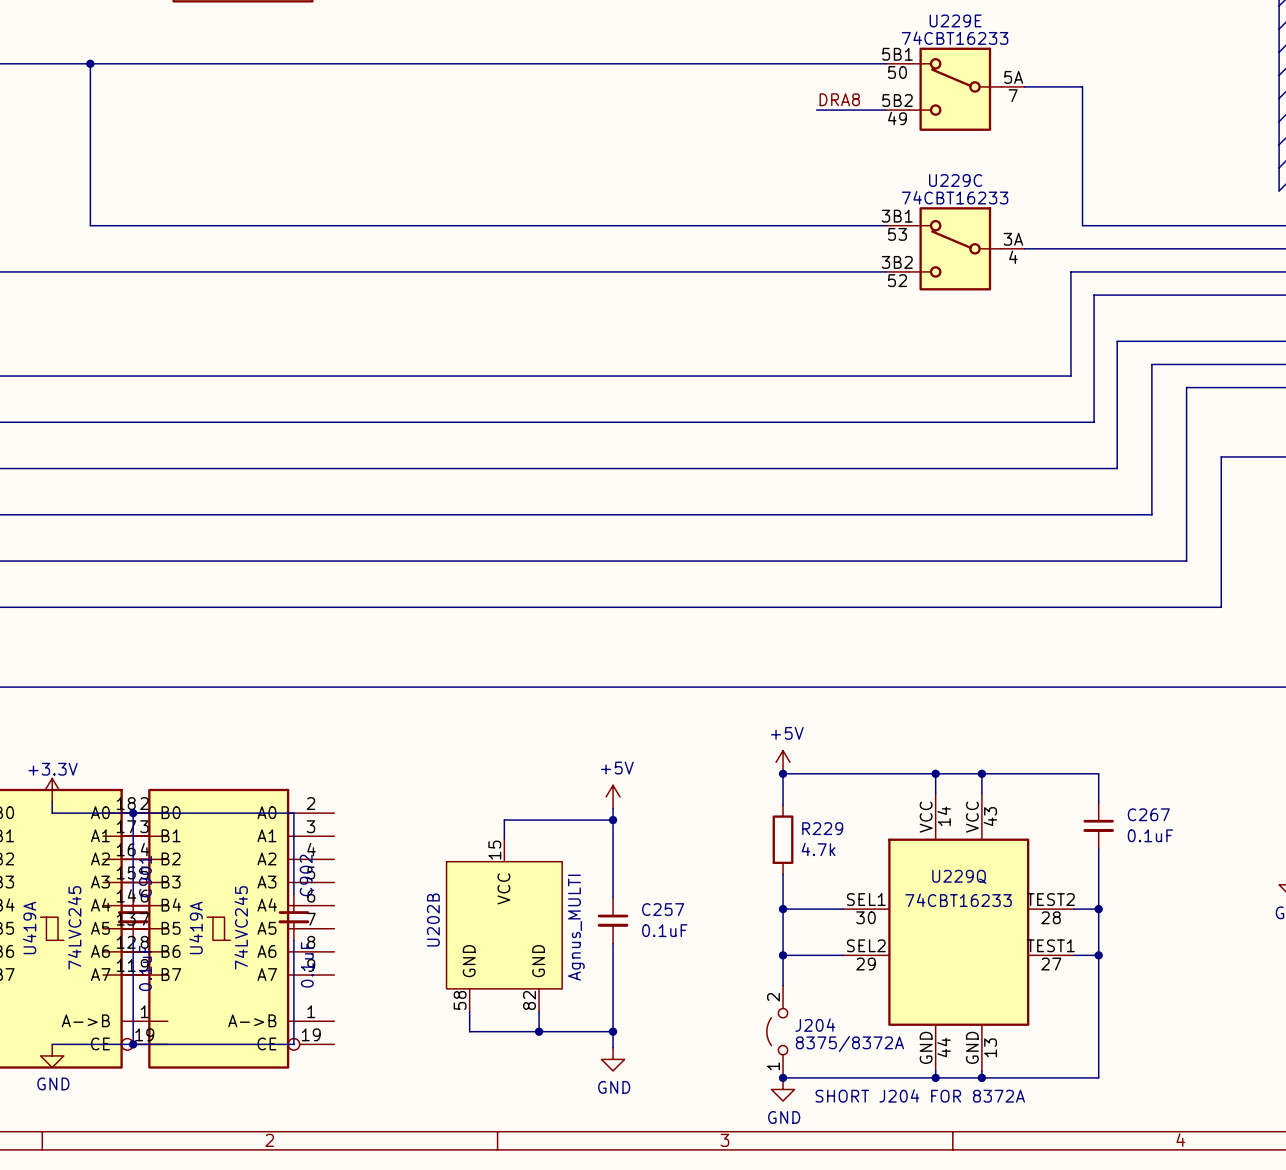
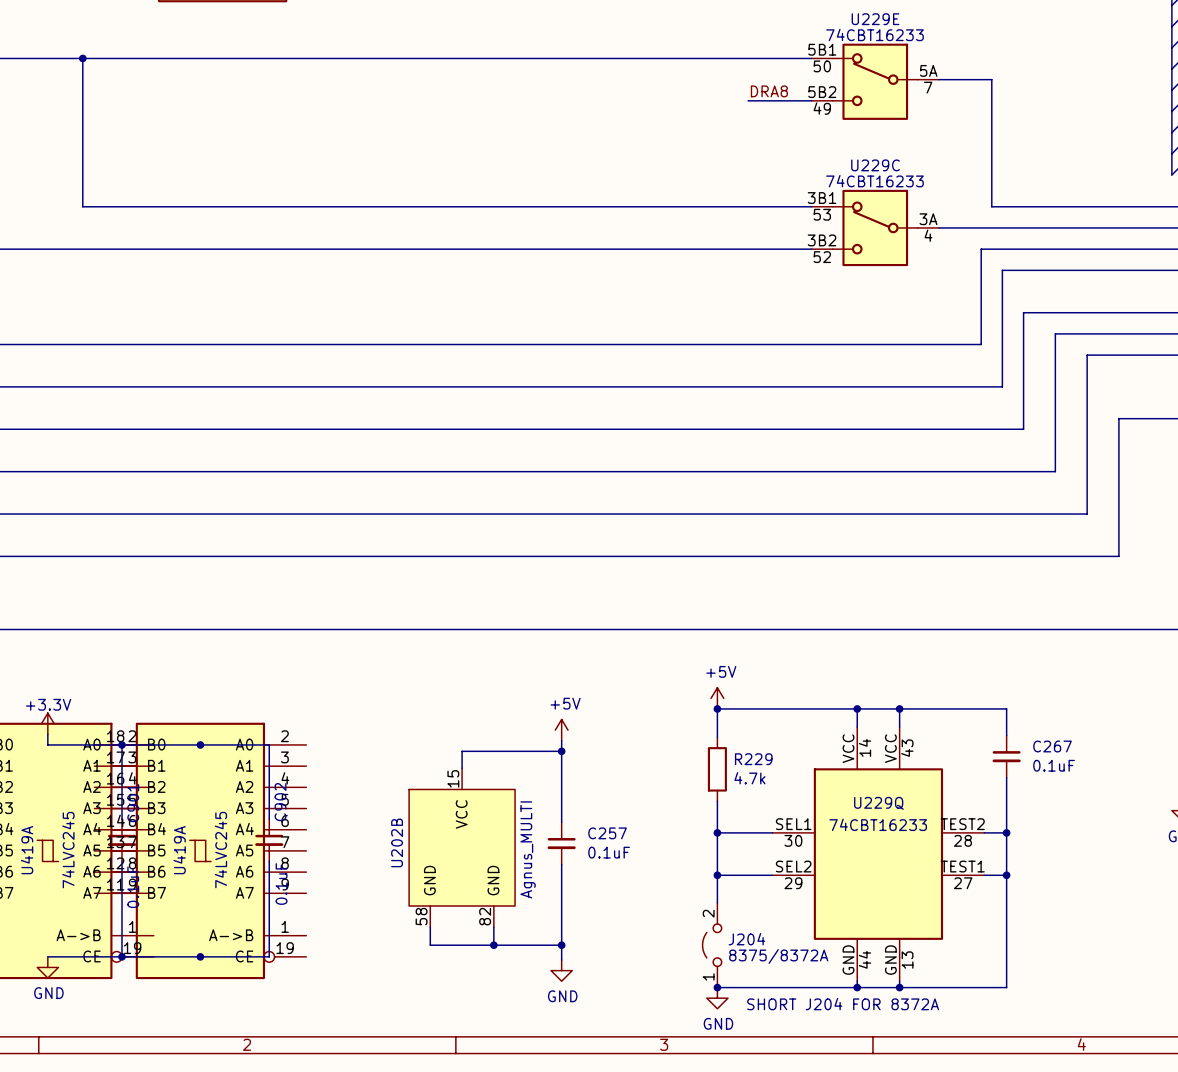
junction: none -> (200, 744)
junction: none -> (200, 956)

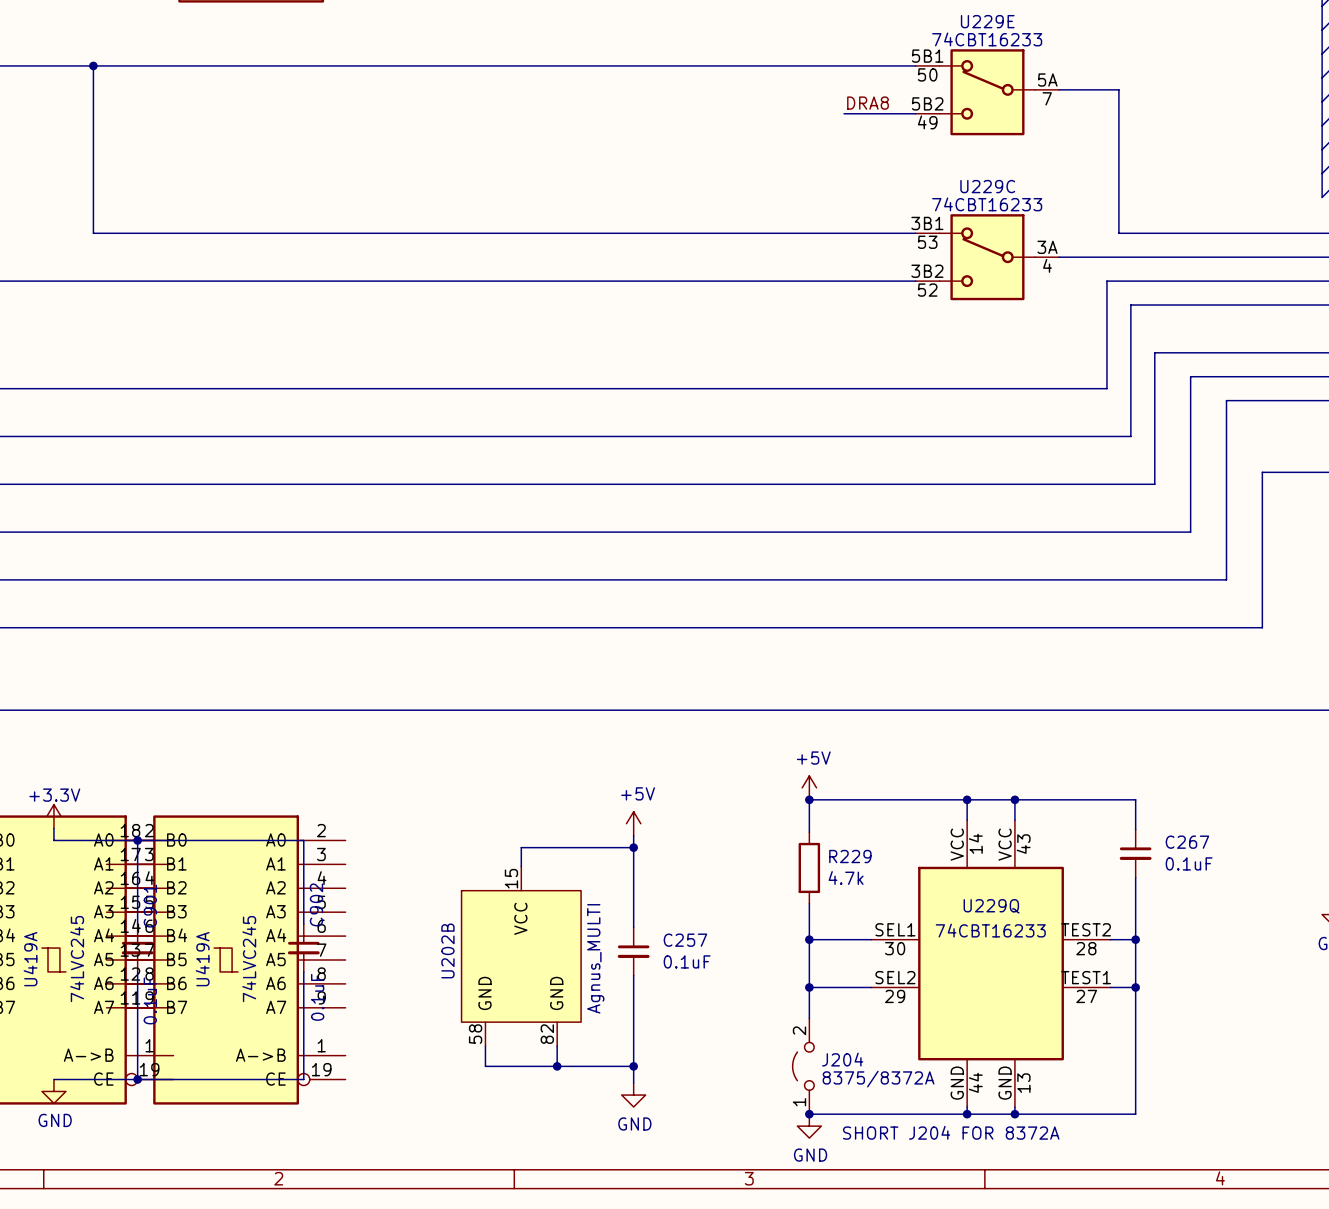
junction: (200, 744) -> none
junction: (200, 956) -> none

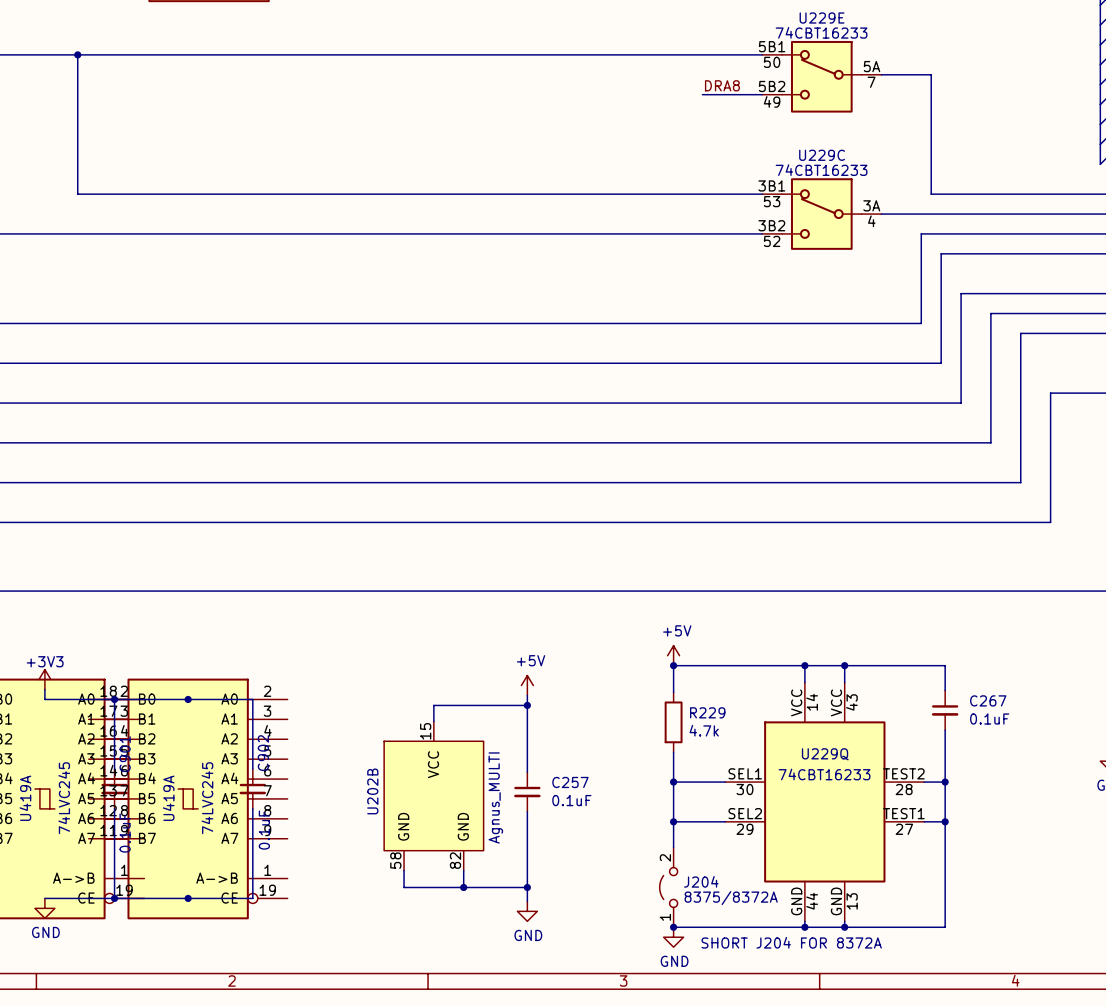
power symbol: +3.3V (53, 816) -> +3V3 (44, 679)
junction: none -> (188, 699)
junction: none -> (188, 898)

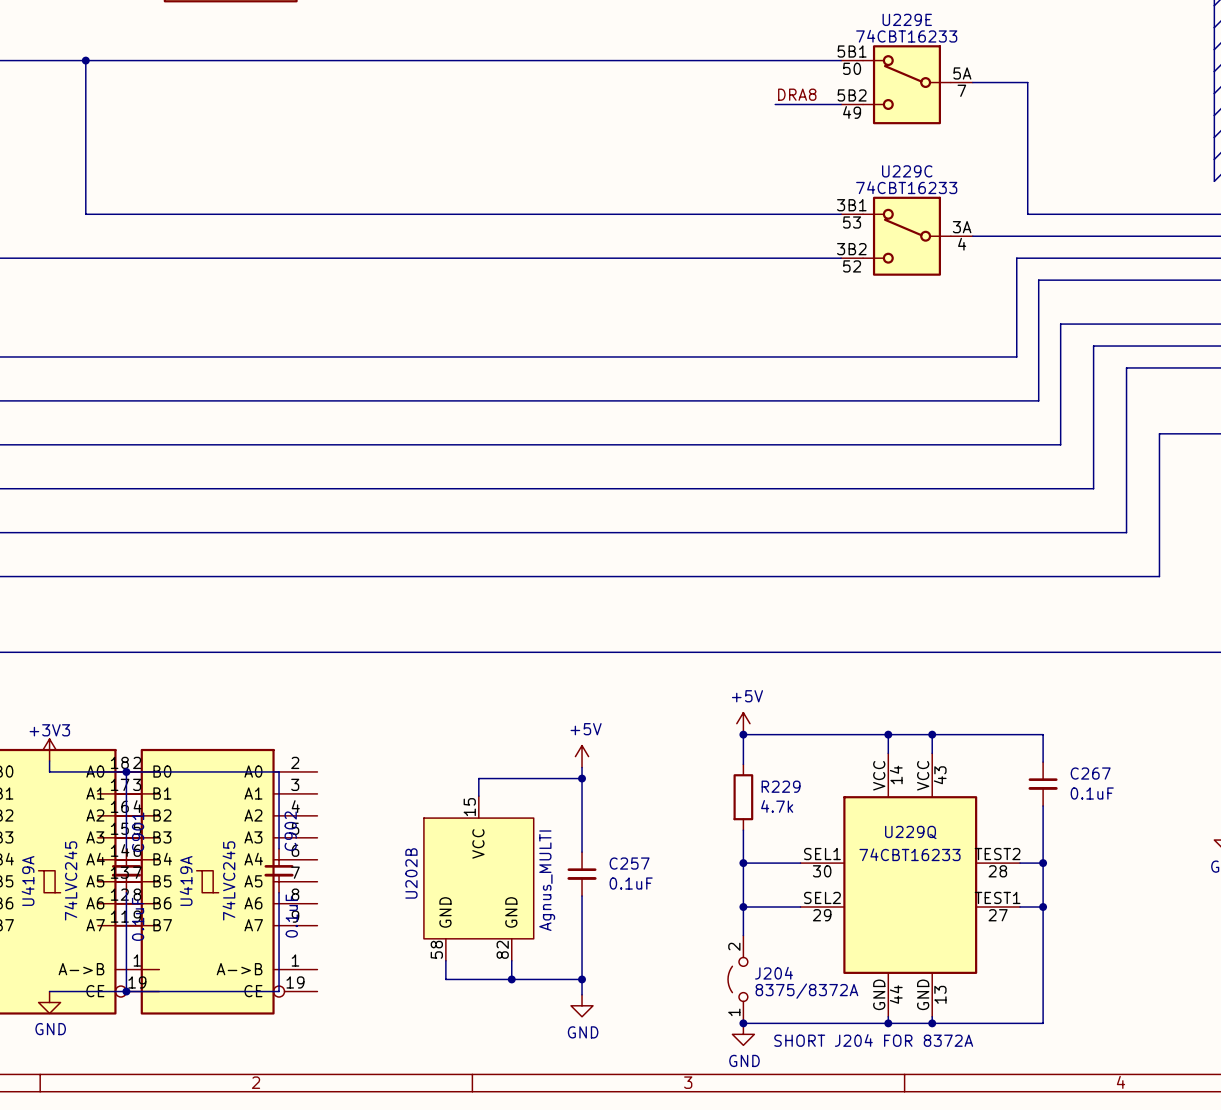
junction: (188, 699) -> none
junction: (188, 898) -> none

